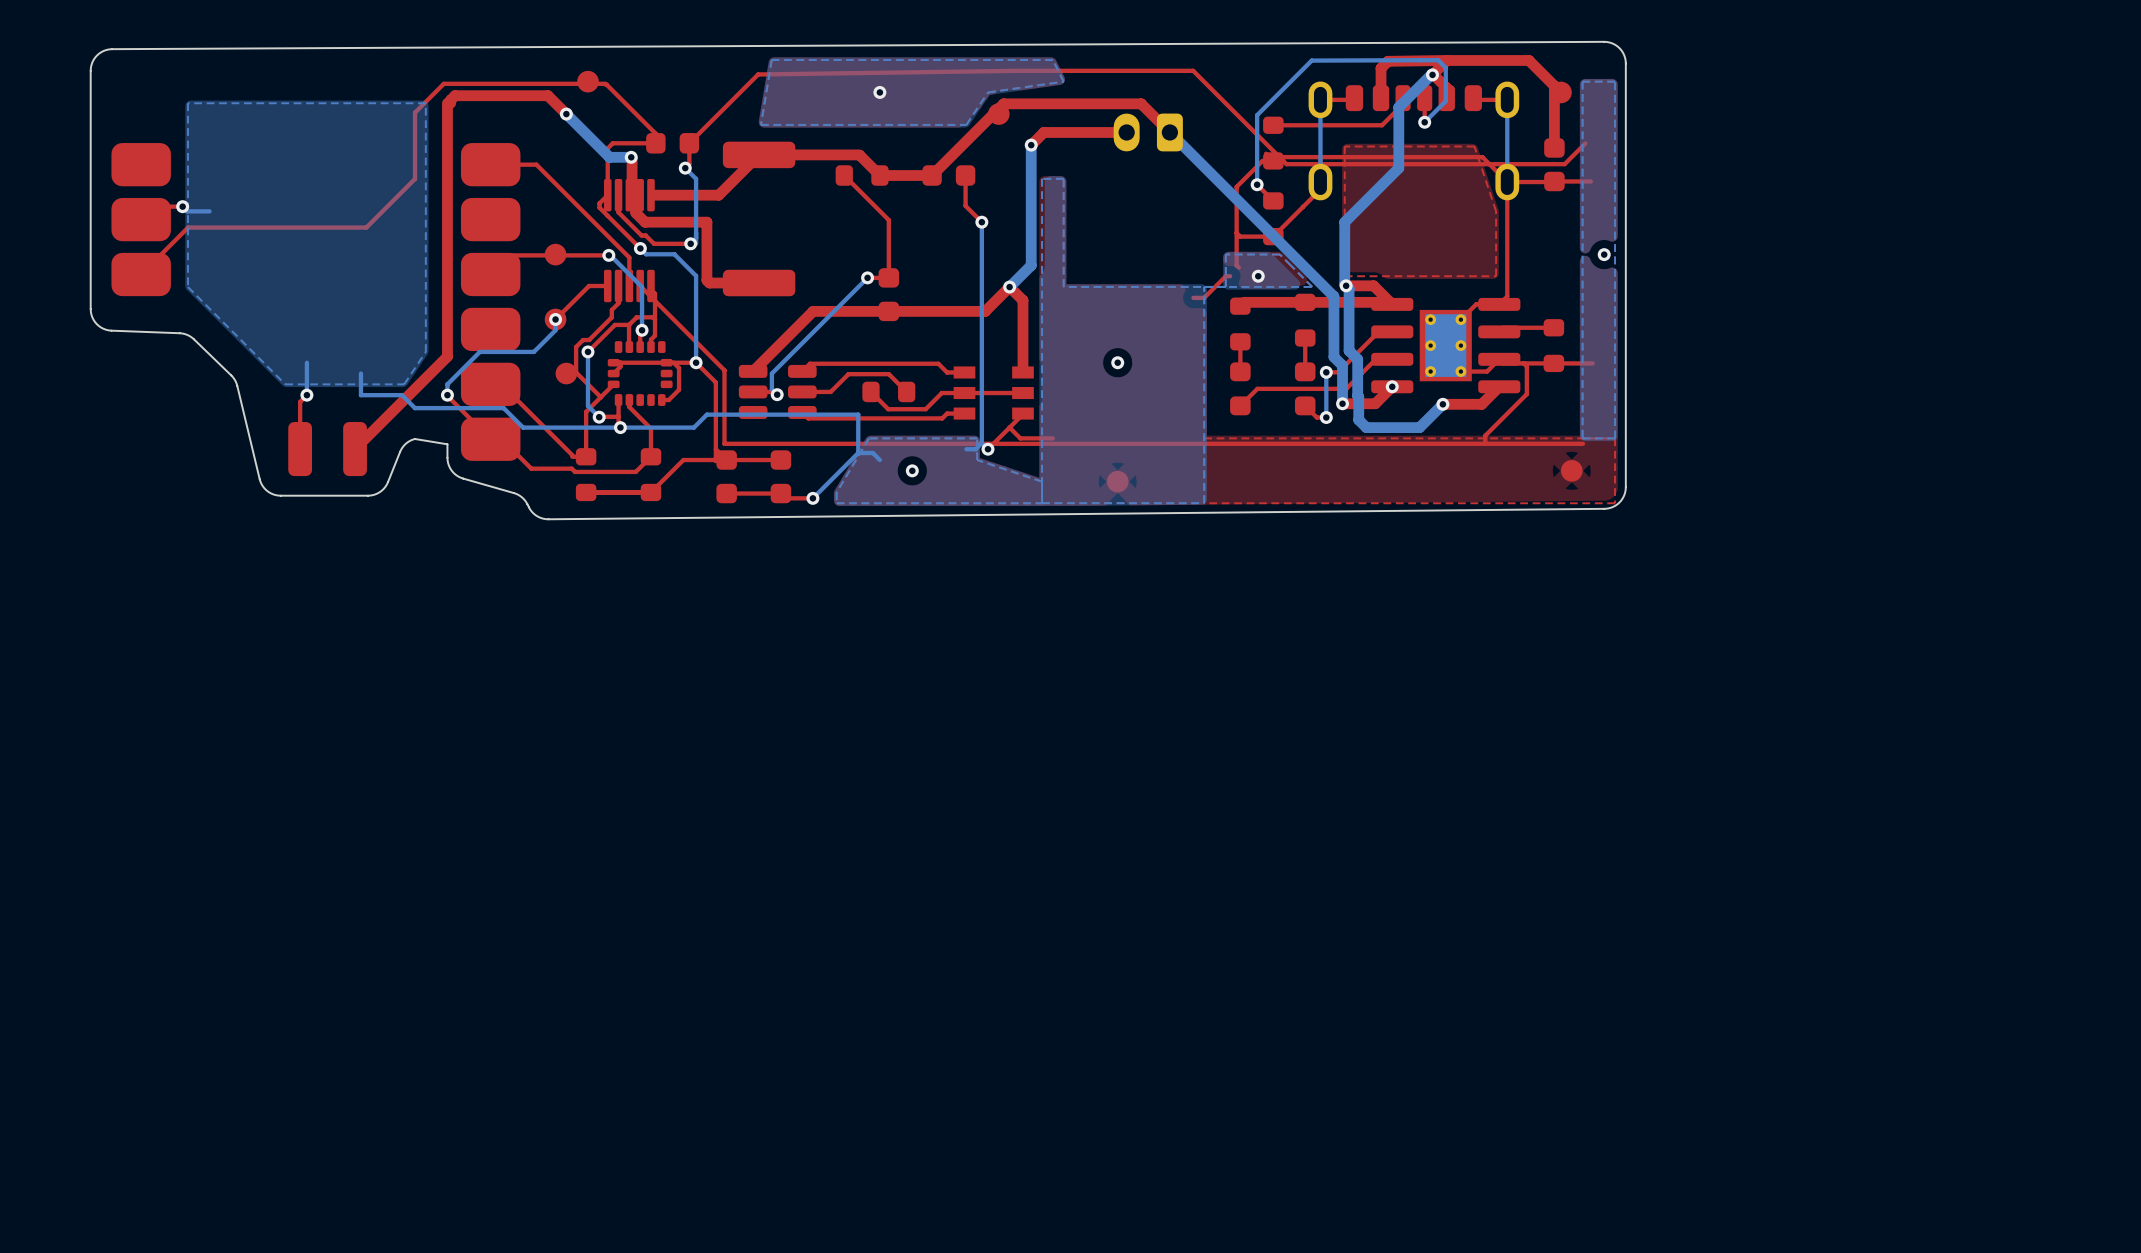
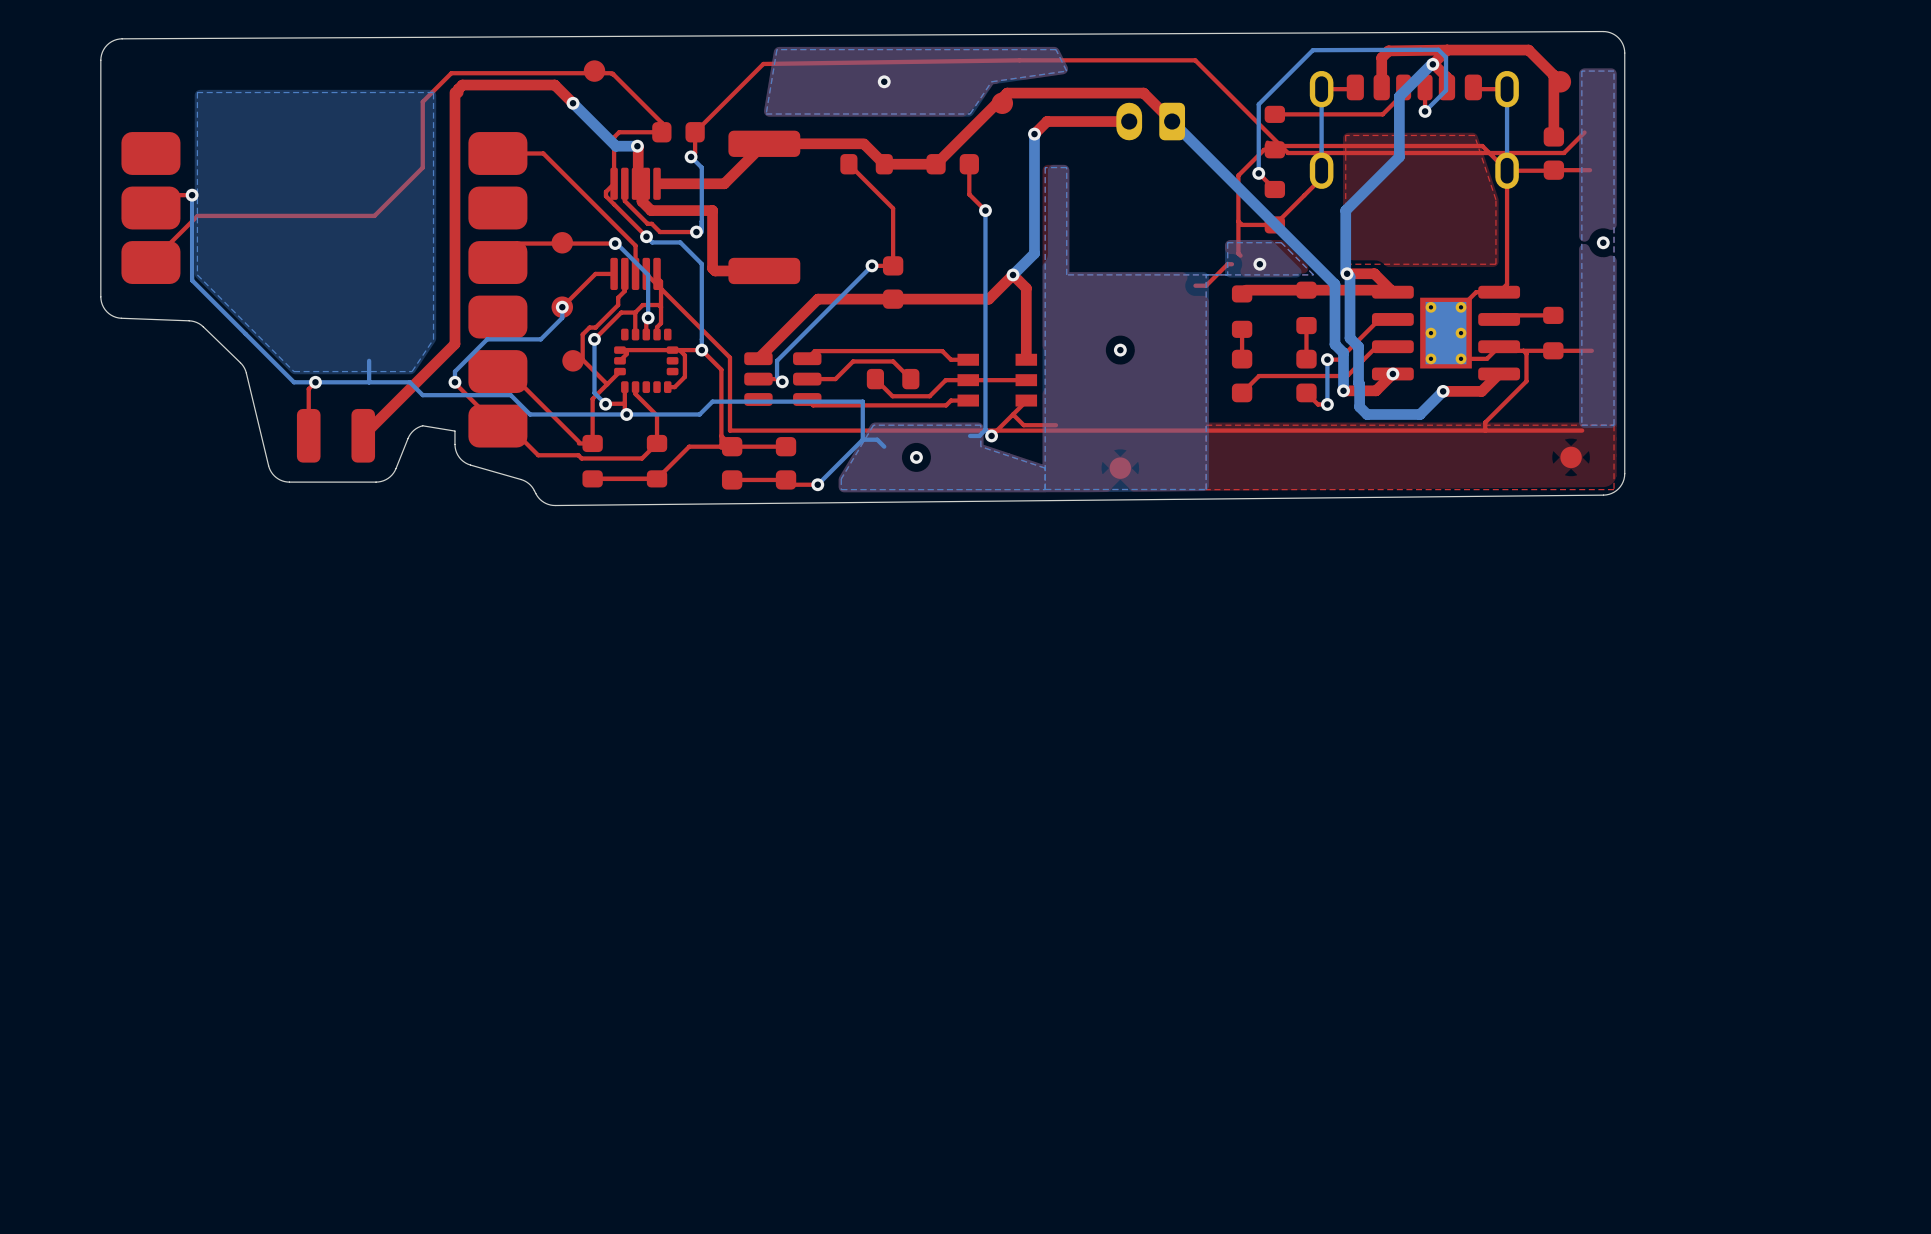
bottom track: (182, 206) (187, 211) (209, 211) -> (192, 195) (192, 280) (294, 382) (369, 382)
bottom track: (306, 362) (306, 395) -> none

